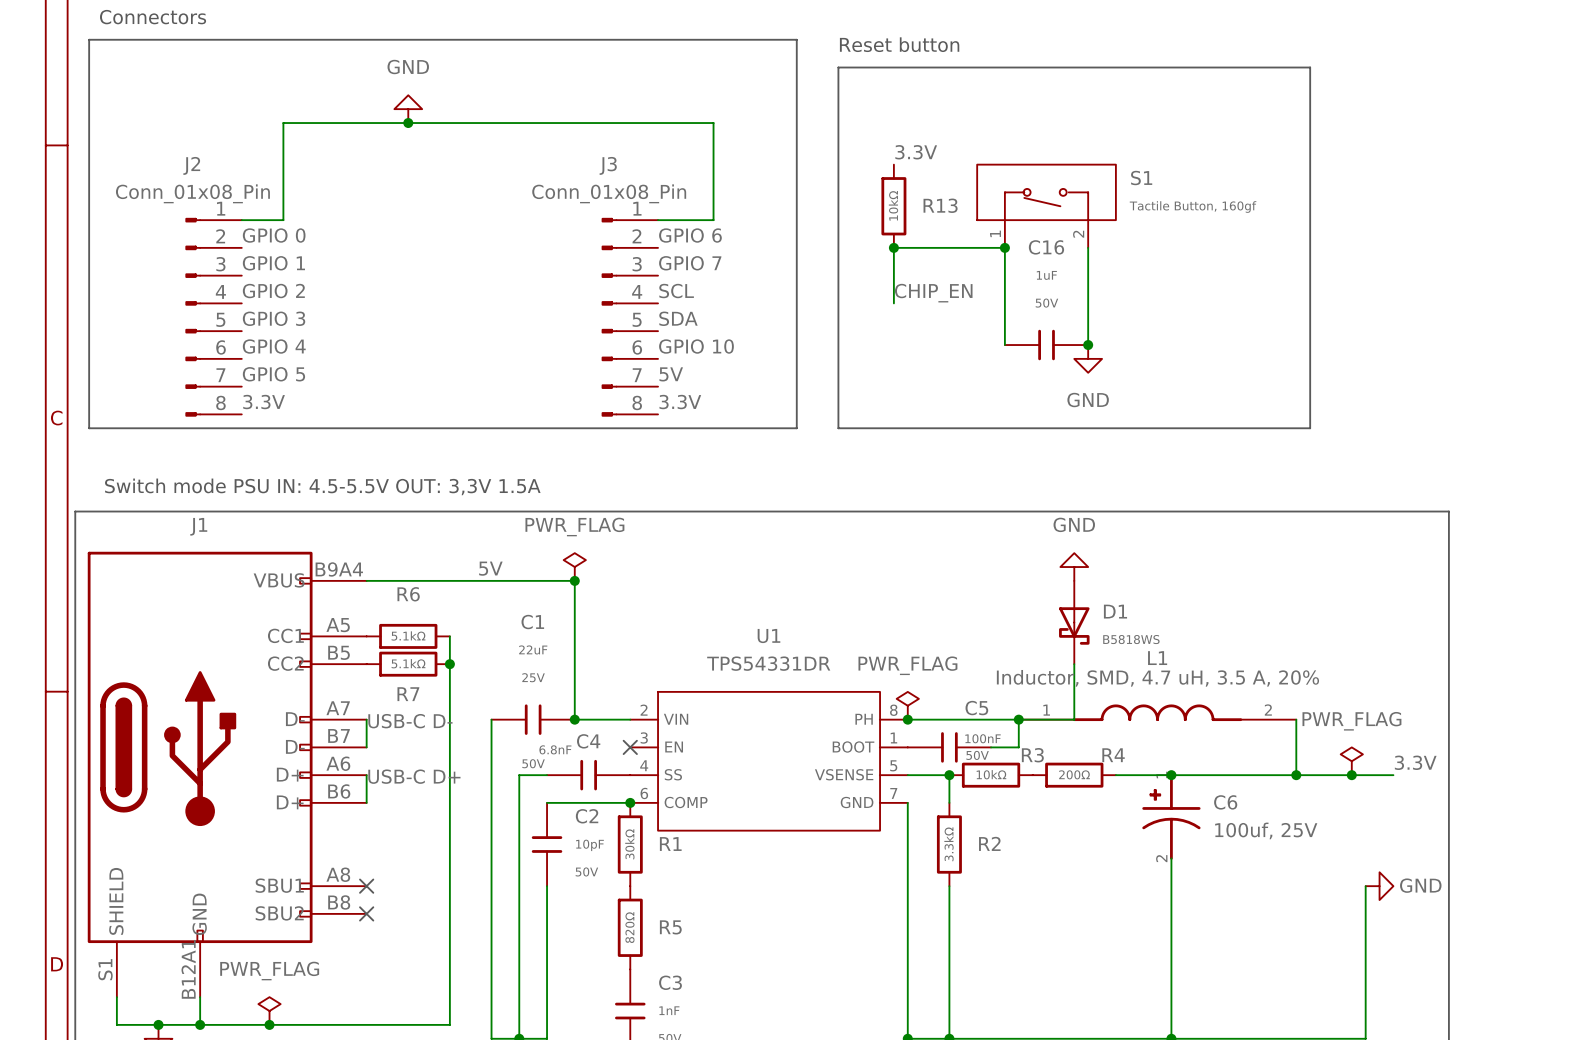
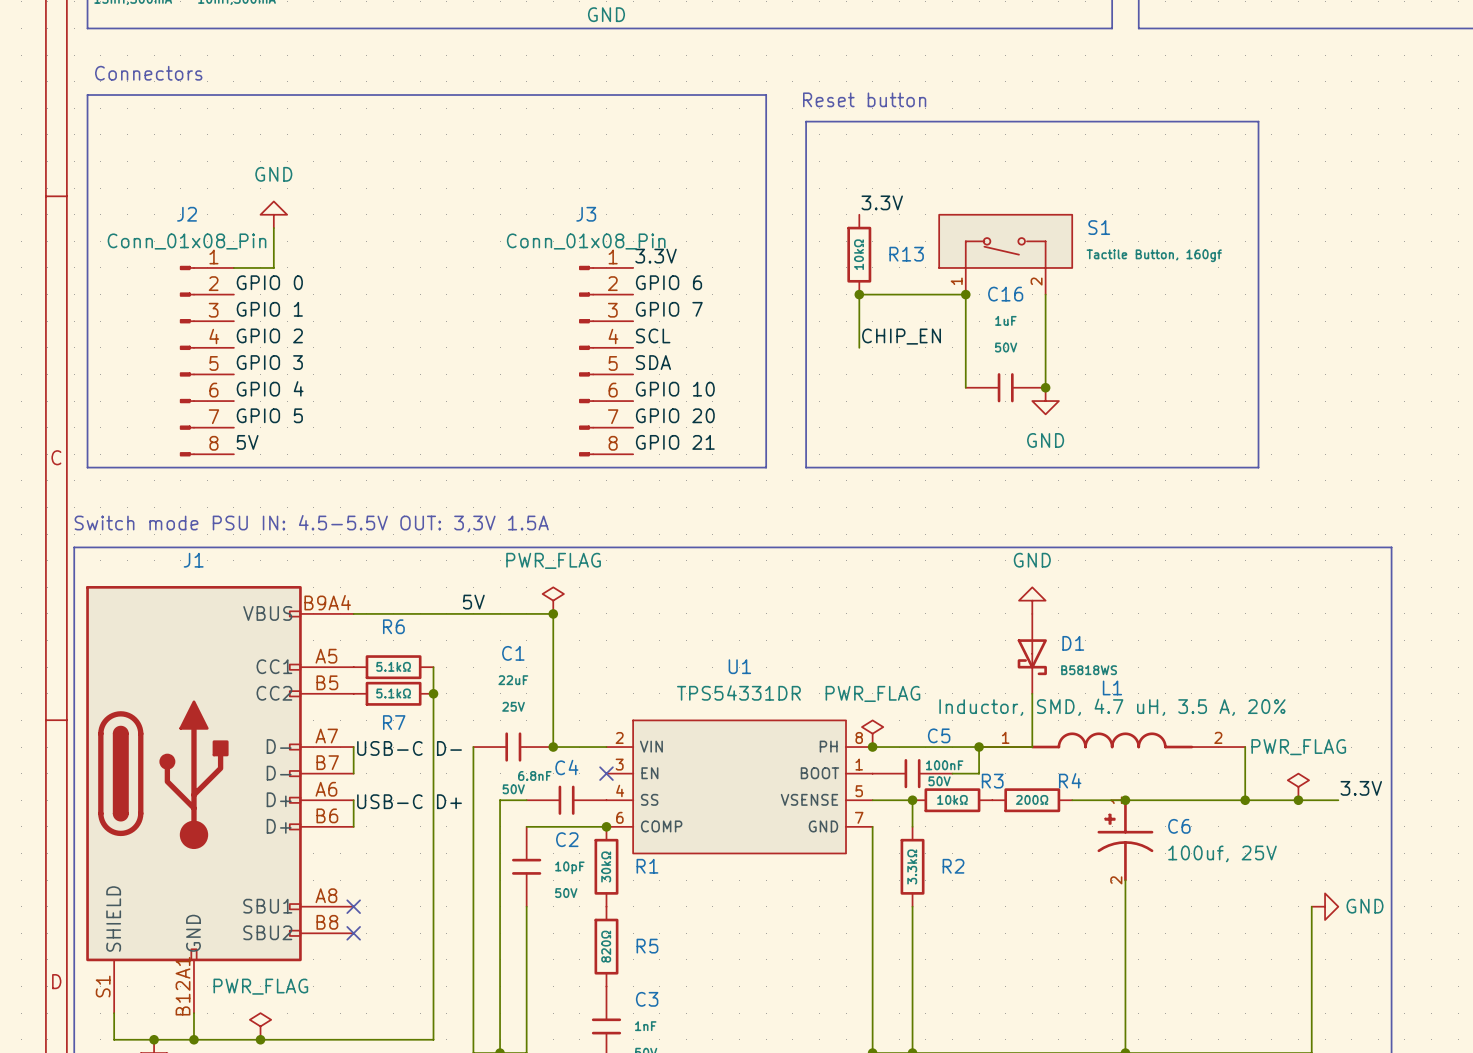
power symbol position: GND (408, 109) -> GND (273, 214)
junction: (408, 123) -> none
wire: (283, 178) (283, 123) (713, 123) (713, 220) (658, 220) -> none
label: none -> 3.3V (656, 256)
label: 5V (671, 374) -> GPIO 20 (675, 415)
label: 3.3V (264, 402) -> 5V (247, 442)
label: 3.3V (680, 402) -> GPIO 21 (675, 442)

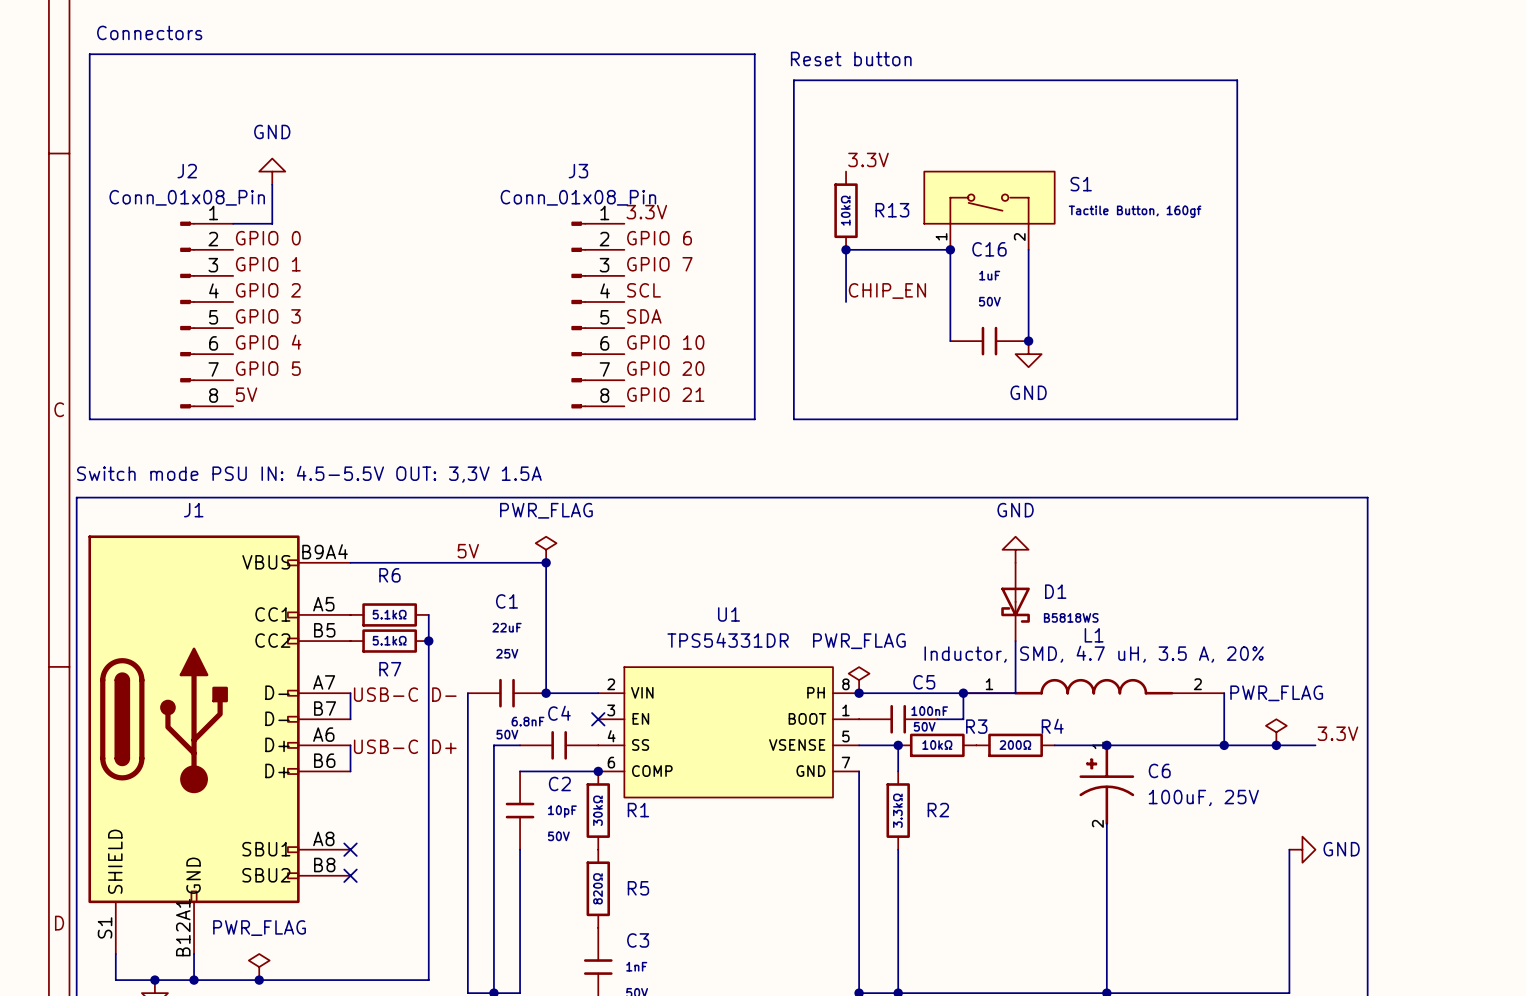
C6 value: 100uf, 25V (1222, 853) -> 100uF, 25V (1203, 797)

